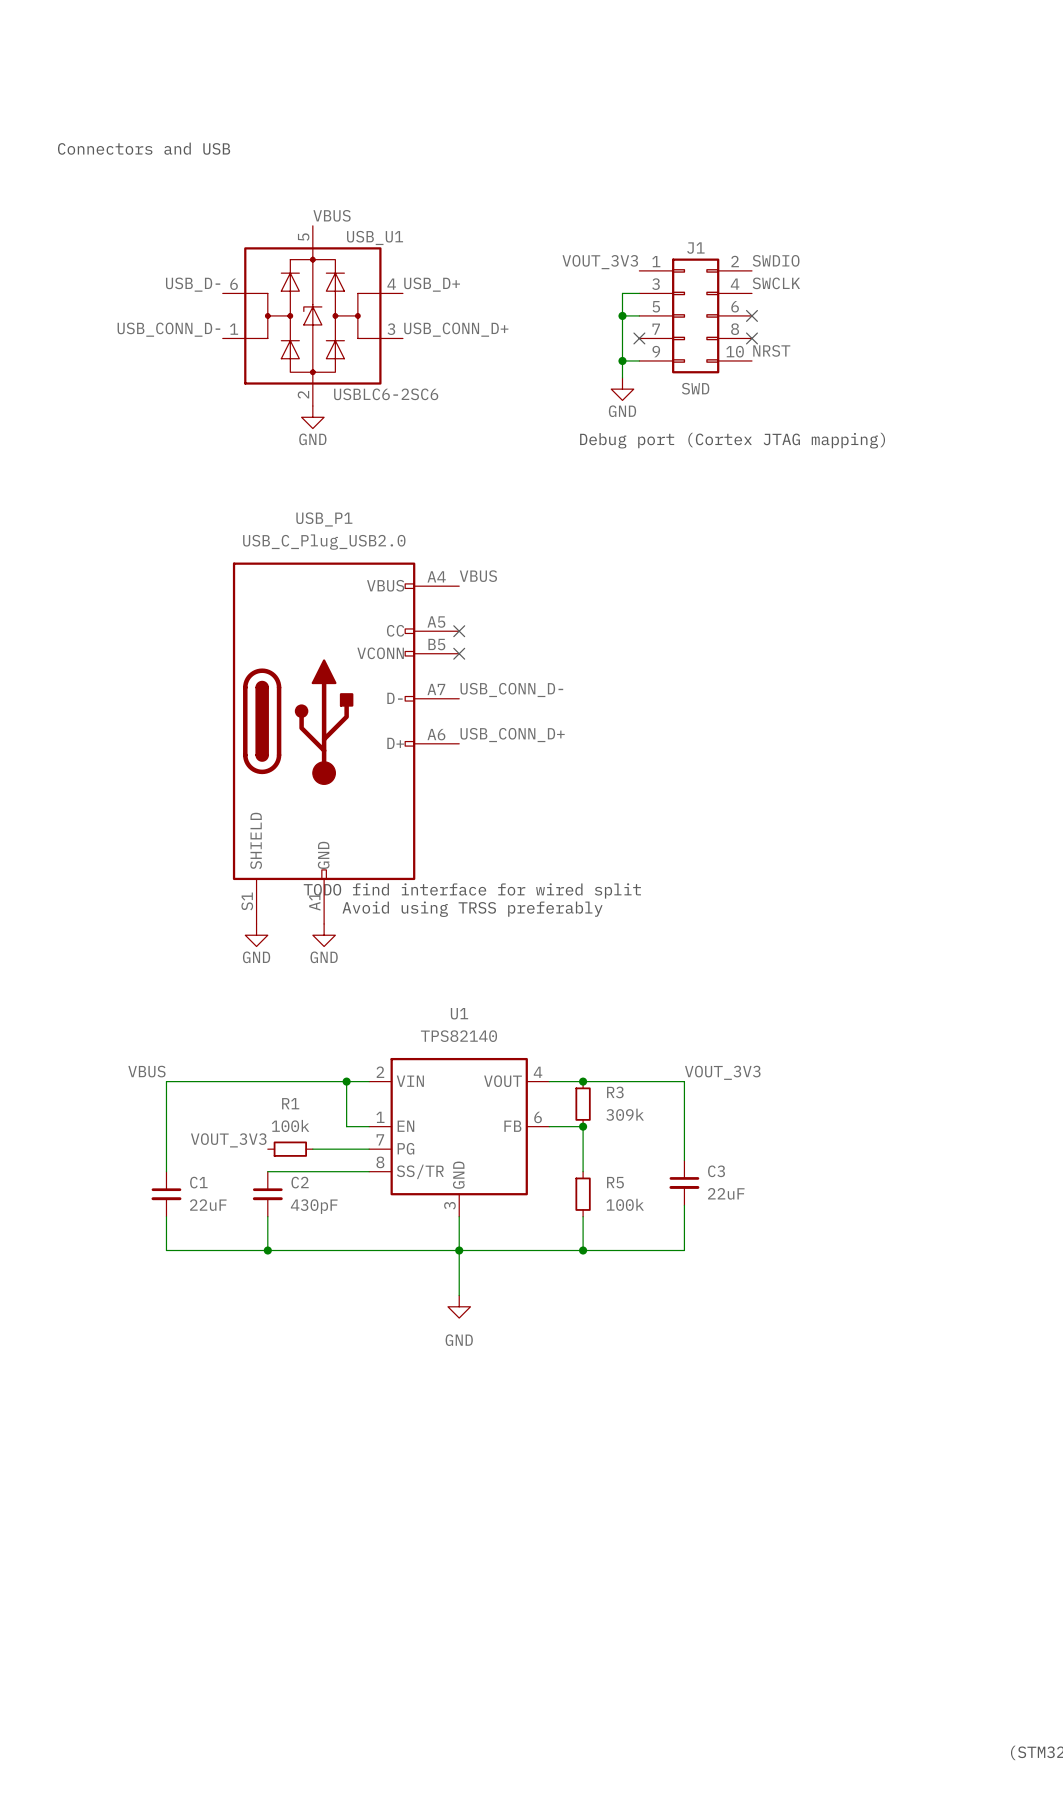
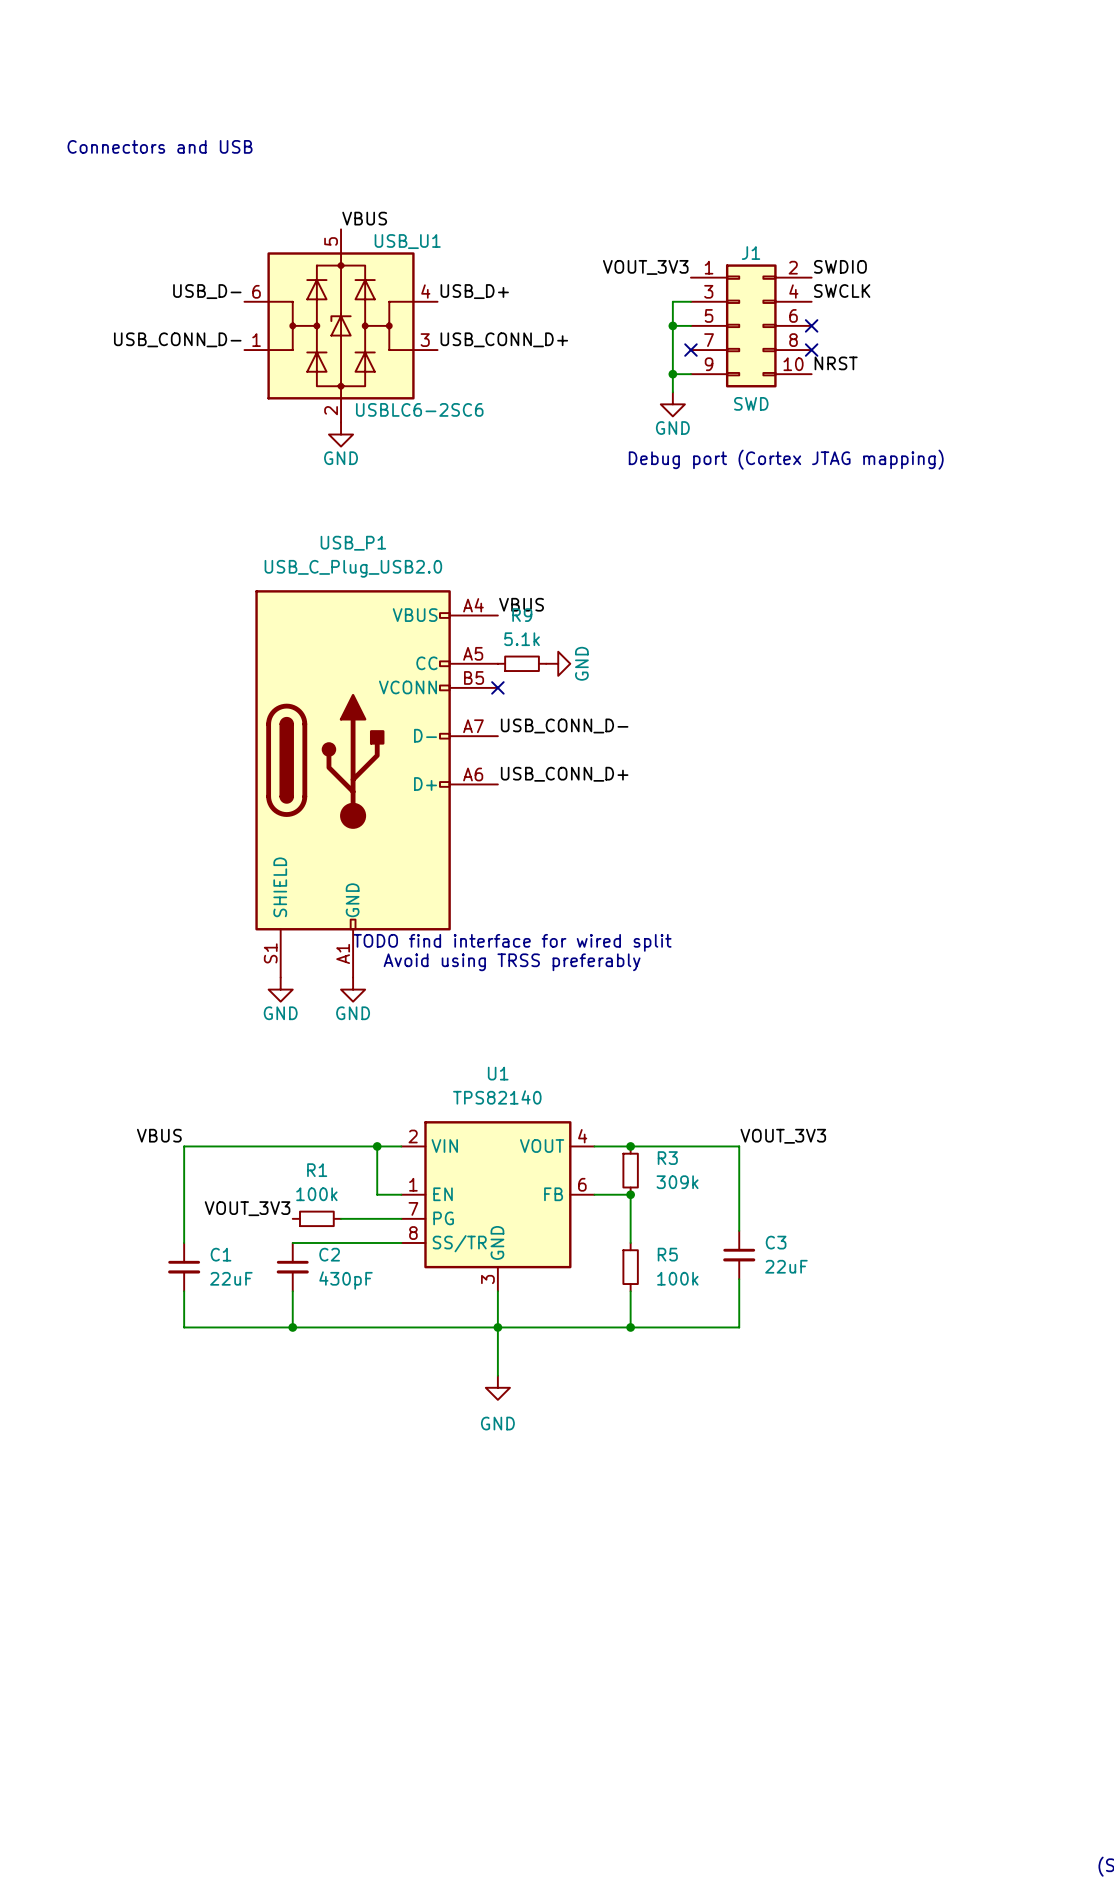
no-connect mark: (459, 631) -> none
R9: none -> 5.1k (522, 663)
power symbol: none -> GND (558, 663)

